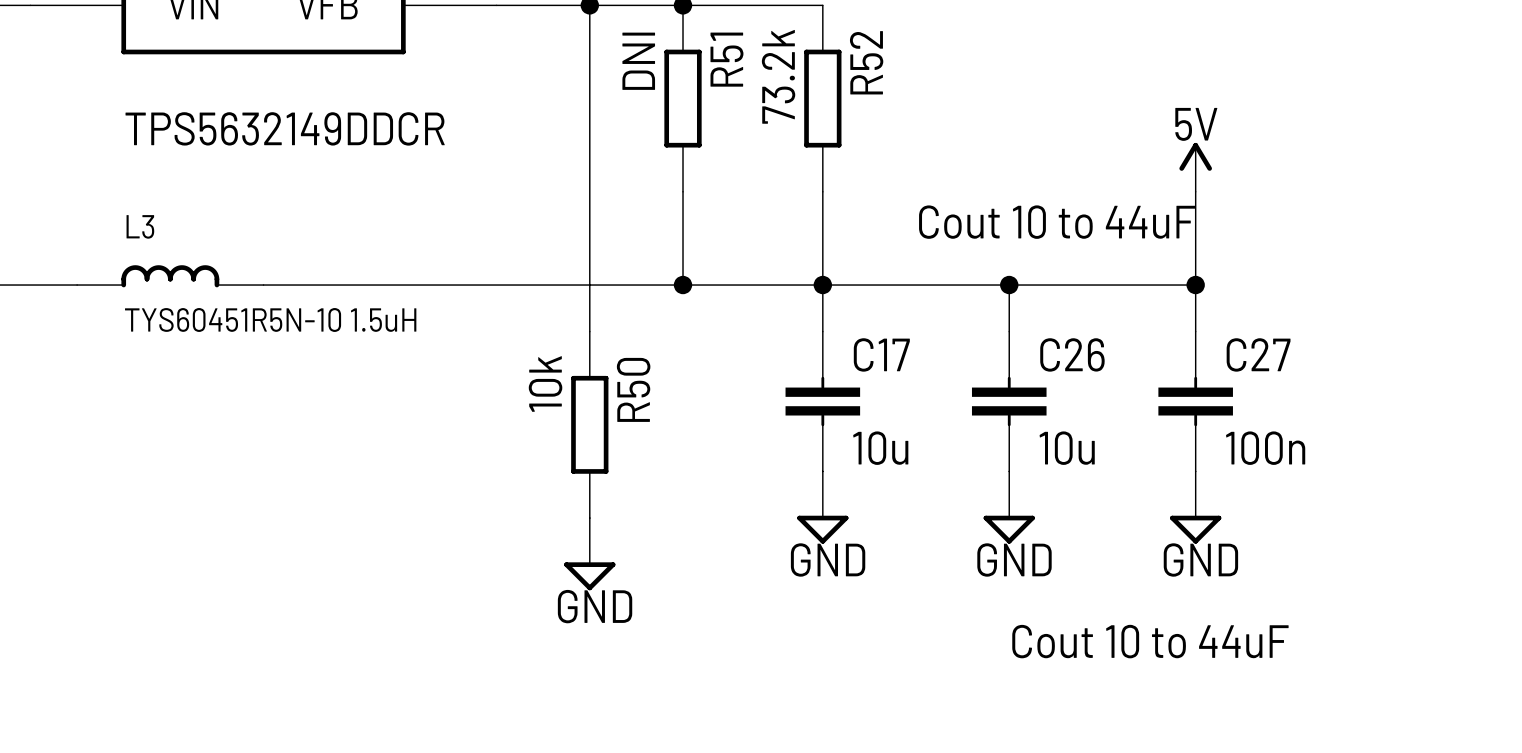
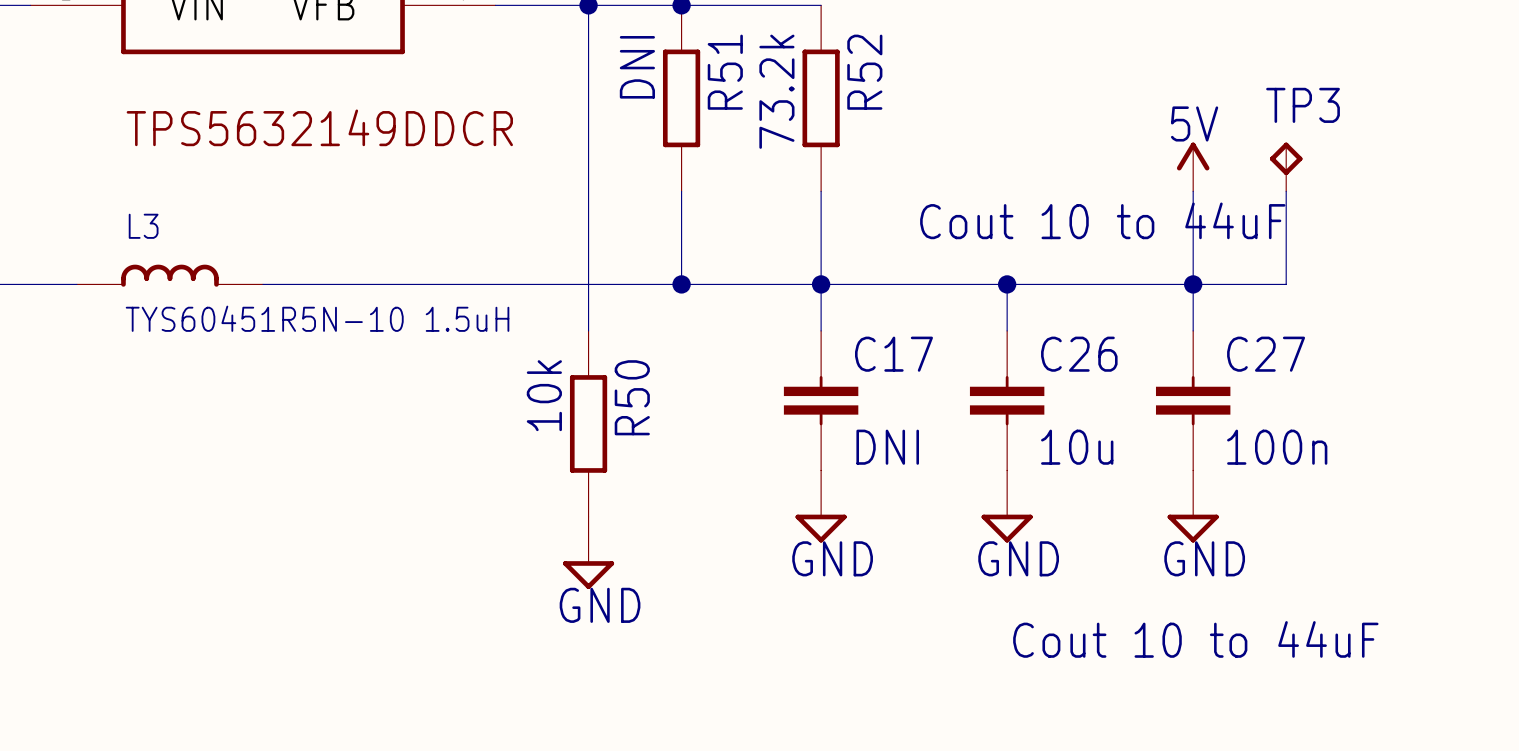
TP3: none -> (1286, 166)
wire: none -> (1286, 191) (1286, 284) (1193, 284)
C17 value: 10u (880, 448) -> DNI (887, 447)

